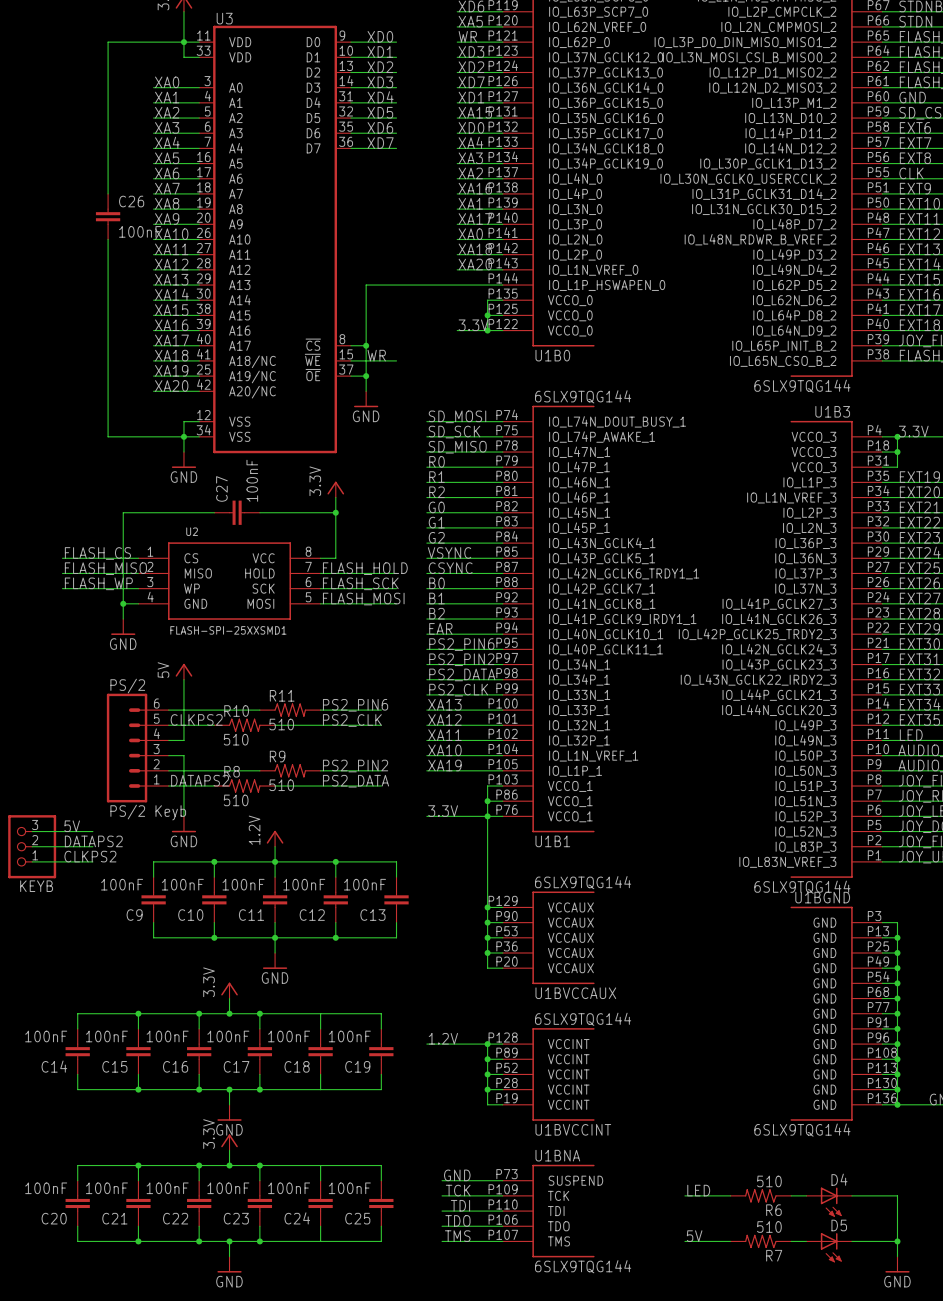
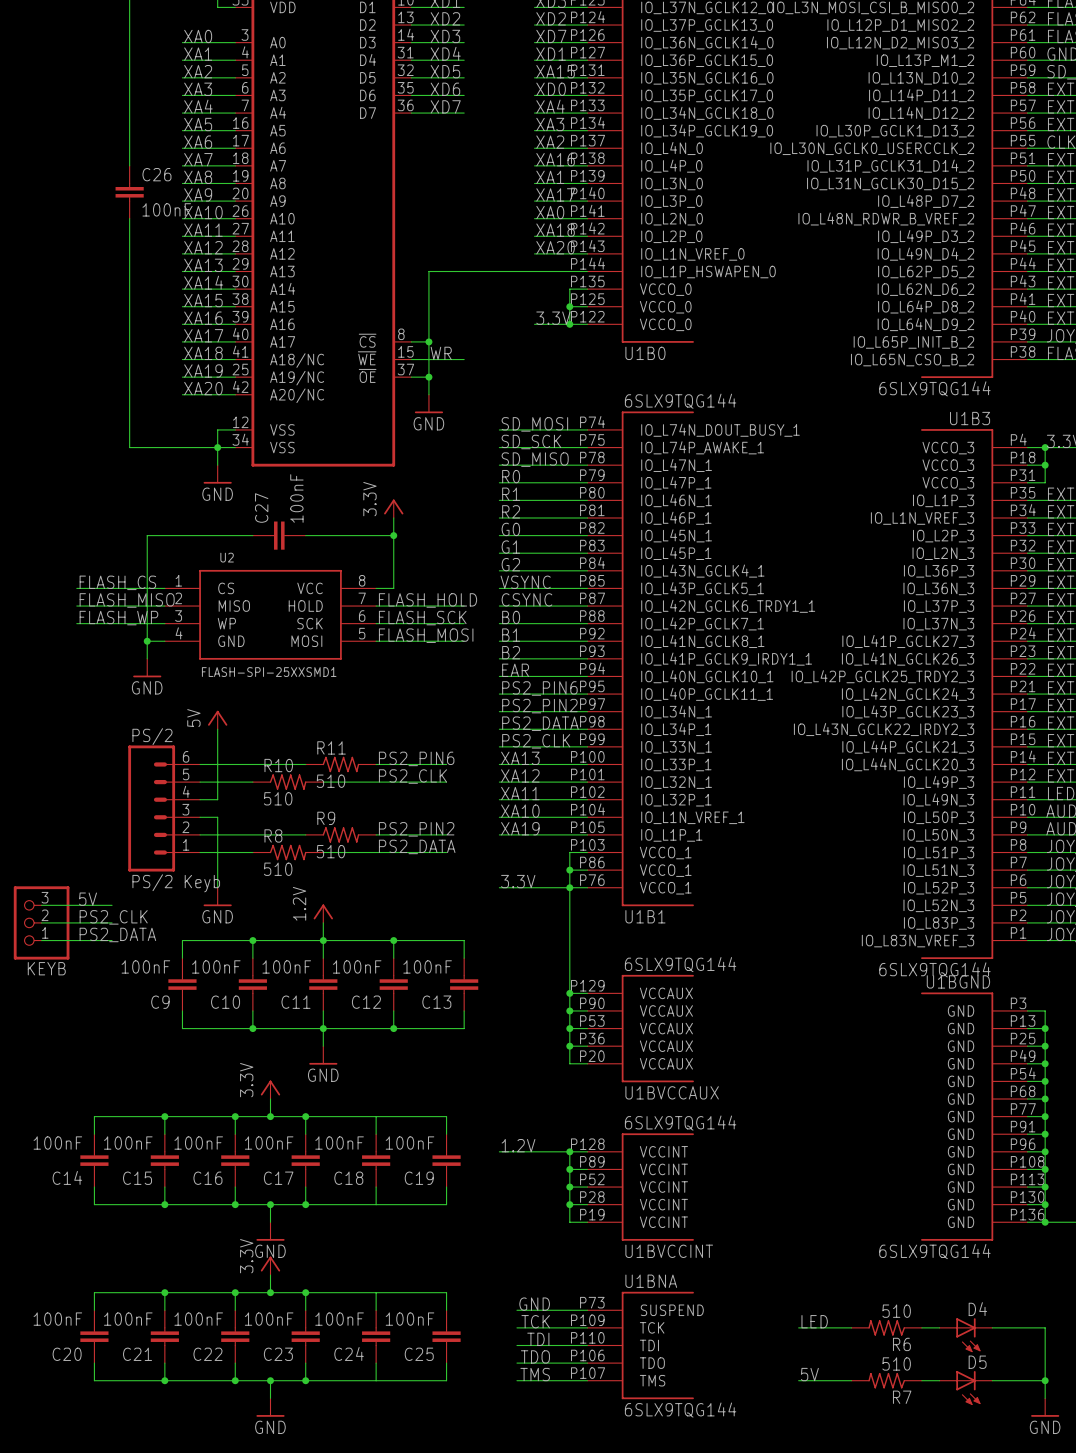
label: CLKPS2 (196, 719) -> none
label: DATAPS2 (200, 780) -> none
label: DATAPS2 (93, 841) -> PS2_CLK (113, 917)
label: CLKPS2 (90, 856) -> PS2_DATA (117, 934)

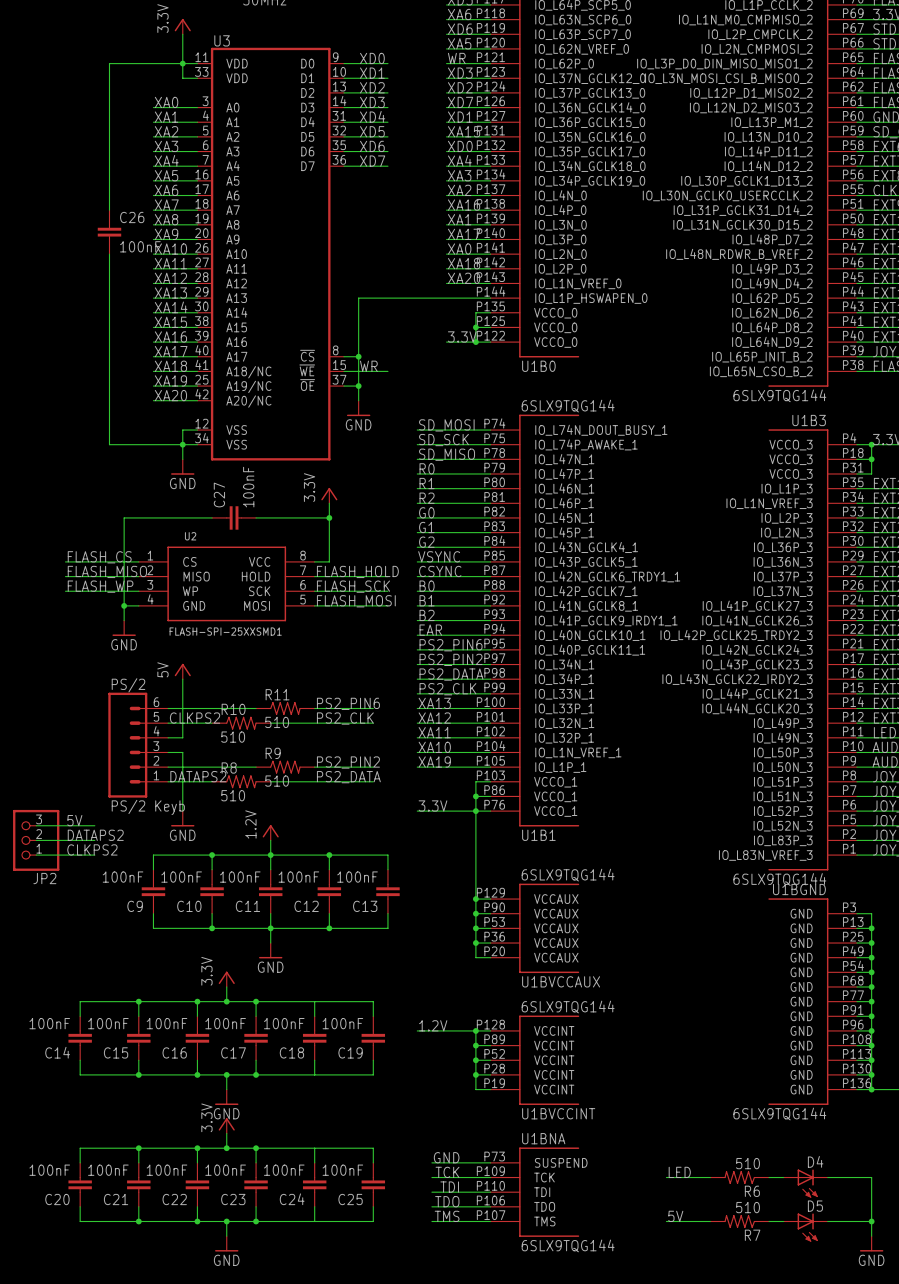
label: none -> CLKPS2 (195, 718)
label: none -> DATAPS2 (198, 776)
label: PS2_CLK (113, 917) -> DATAPS2 (95, 835)
label: PS2_DATA (117, 934) -> CLKPS2 (92, 849)
KEYB name: KEYB (46, 968) -> JP2 (44, 878)

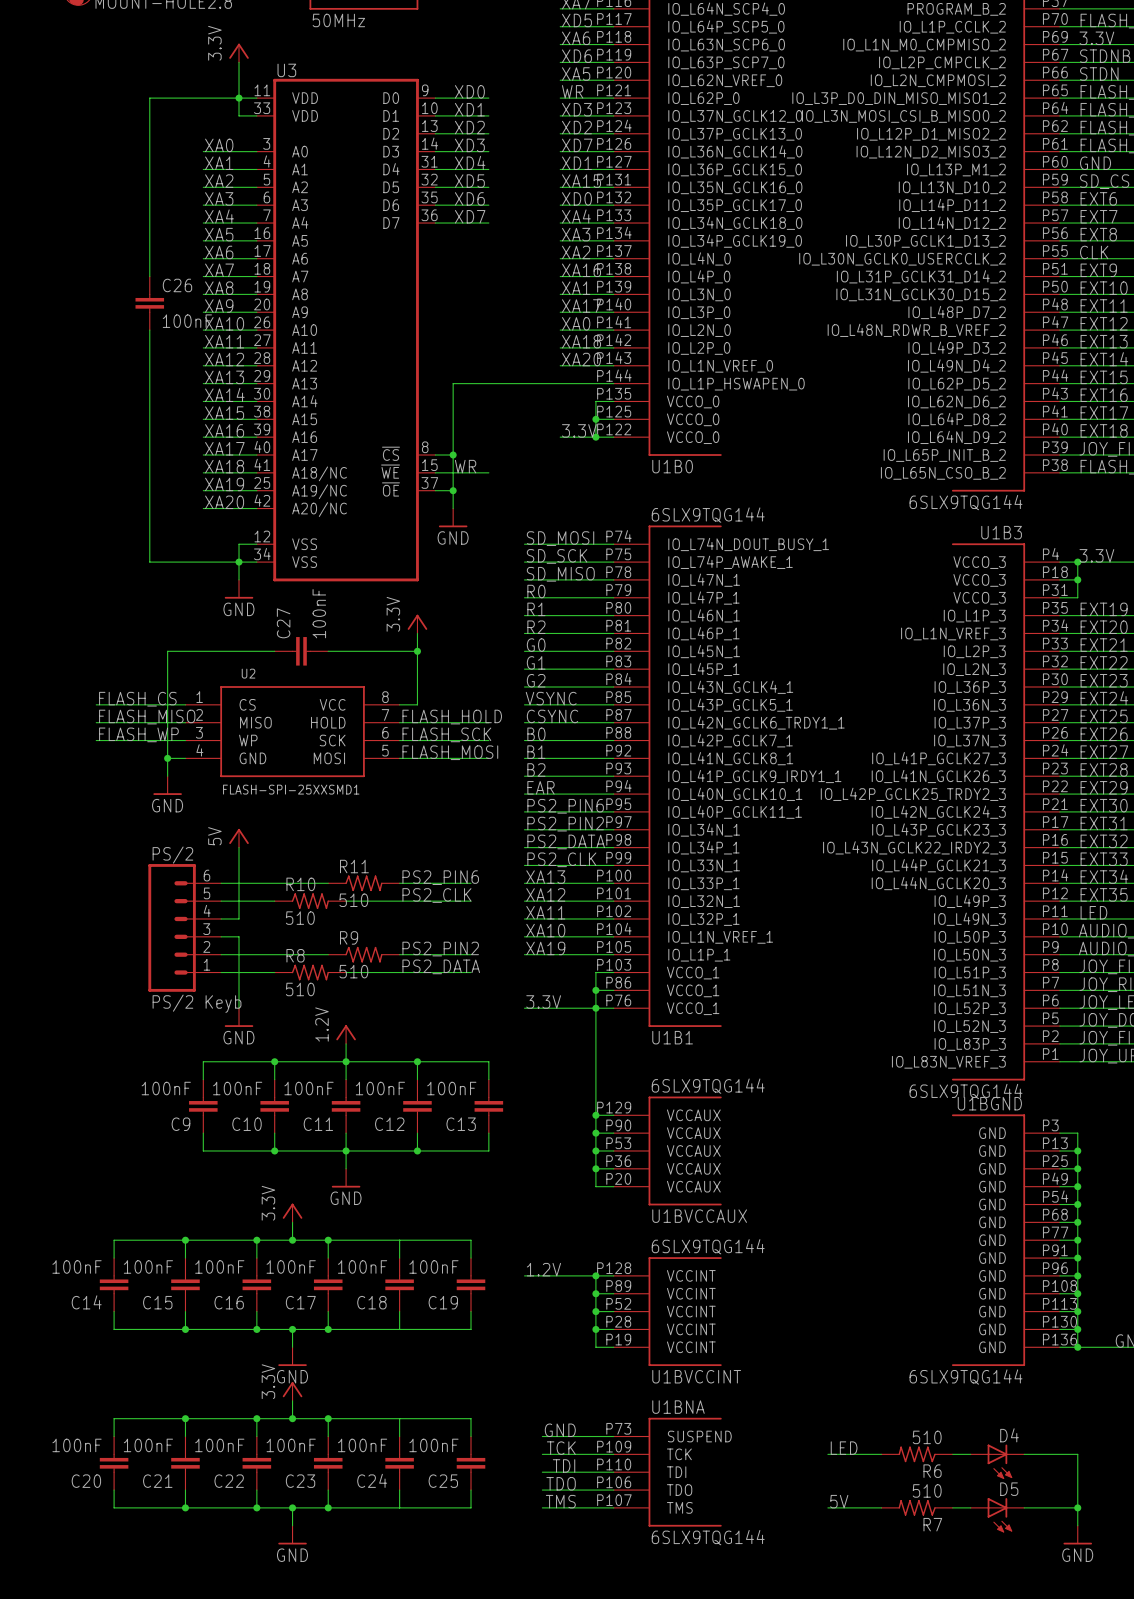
label: CLKPS2 (195, 718) -> none
label: DATAPS2 (198, 776) -> none
label: 5V (74, 820) -> none
wire: (36, 825) (94, 825) -> none
label: DATAPS2 (95, 835) -> none
wire: (36, 840) (94, 840) -> none
JP2: (36, 840) -> none
label: CLKPS2 (92, 849) -> none
wire: (36, 855) (94, 855) -> none

